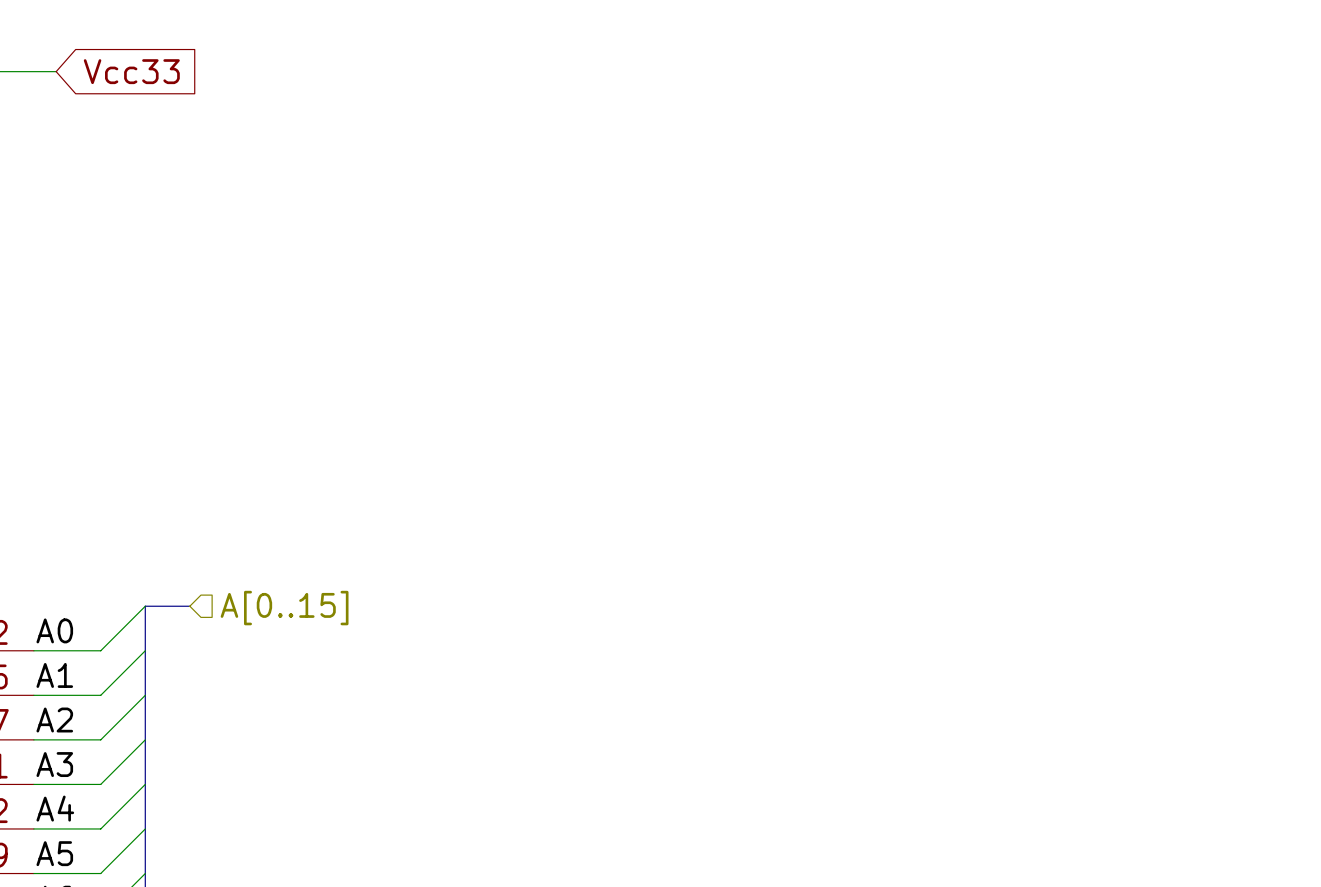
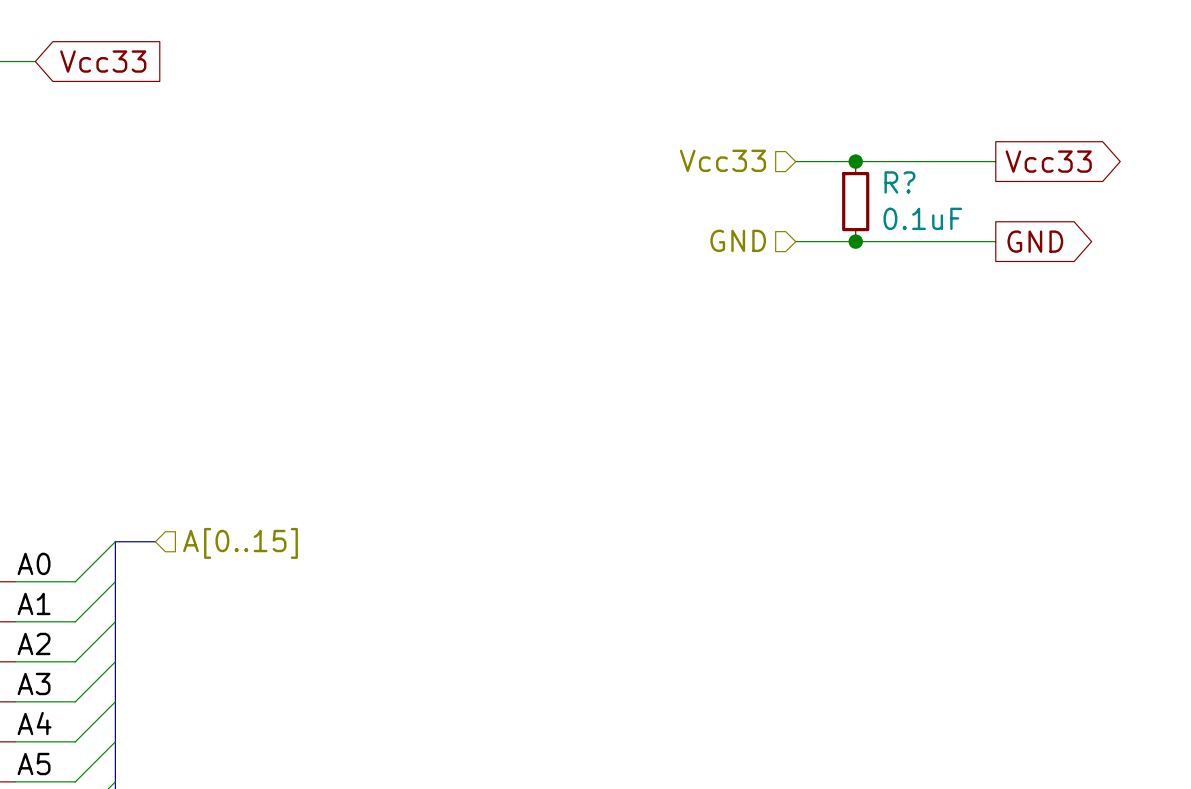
hierarchical label: none -> Vcc33 (722, 160)
wire: none -> (795, 161) (995, 161)
junction: none -> (855, 161)
global label: none -> Vcc33 (1048, 161)
R?: none -> 0.1uF (855, 201)
hierarchical label: none -> GND (738, 240)
wire: none -> (795, 241) (995, 241)
junction: none -> (855, 241)
global label: none -> GND (1035, 241)

